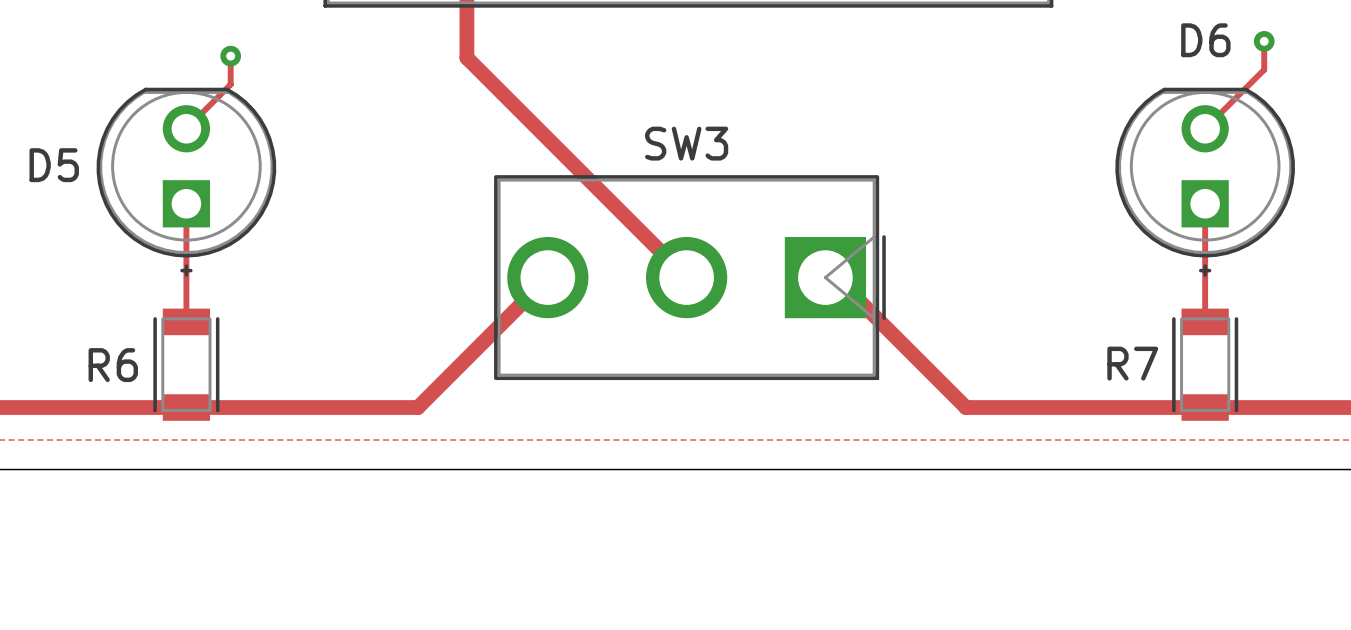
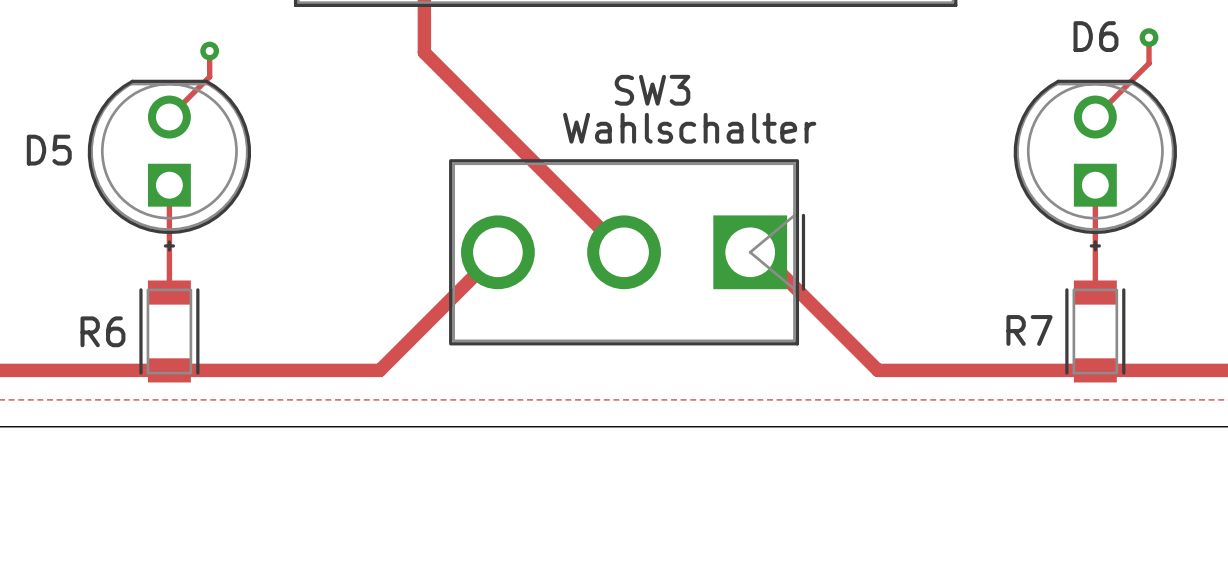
text: none -> Wahlschalter (689, 128)
SW3 name position: SW3 (686, 143) -> SW3 (652, 90)

